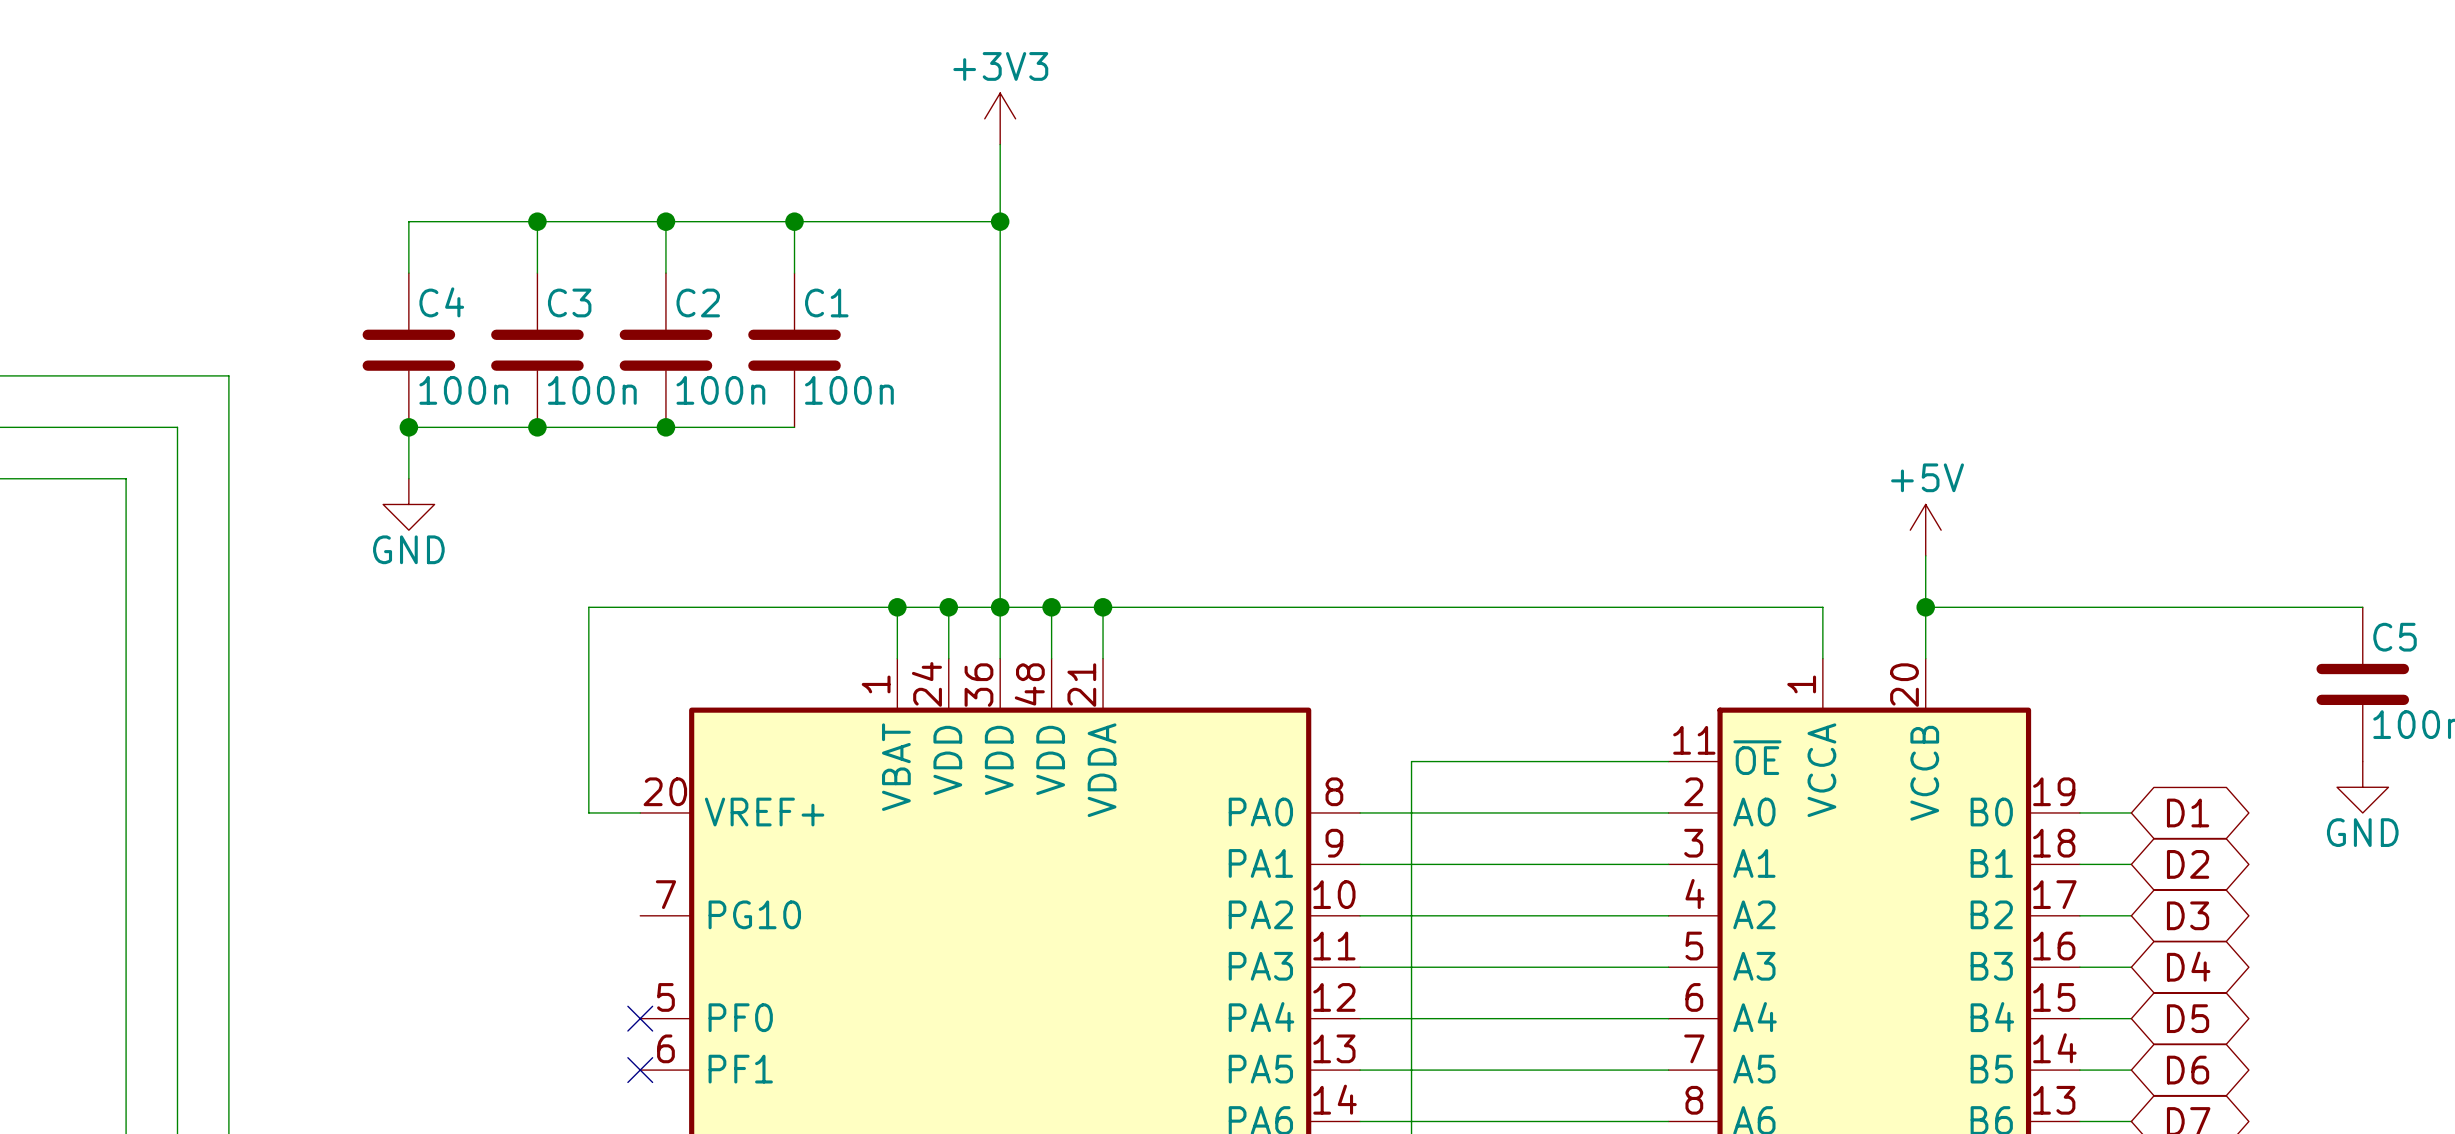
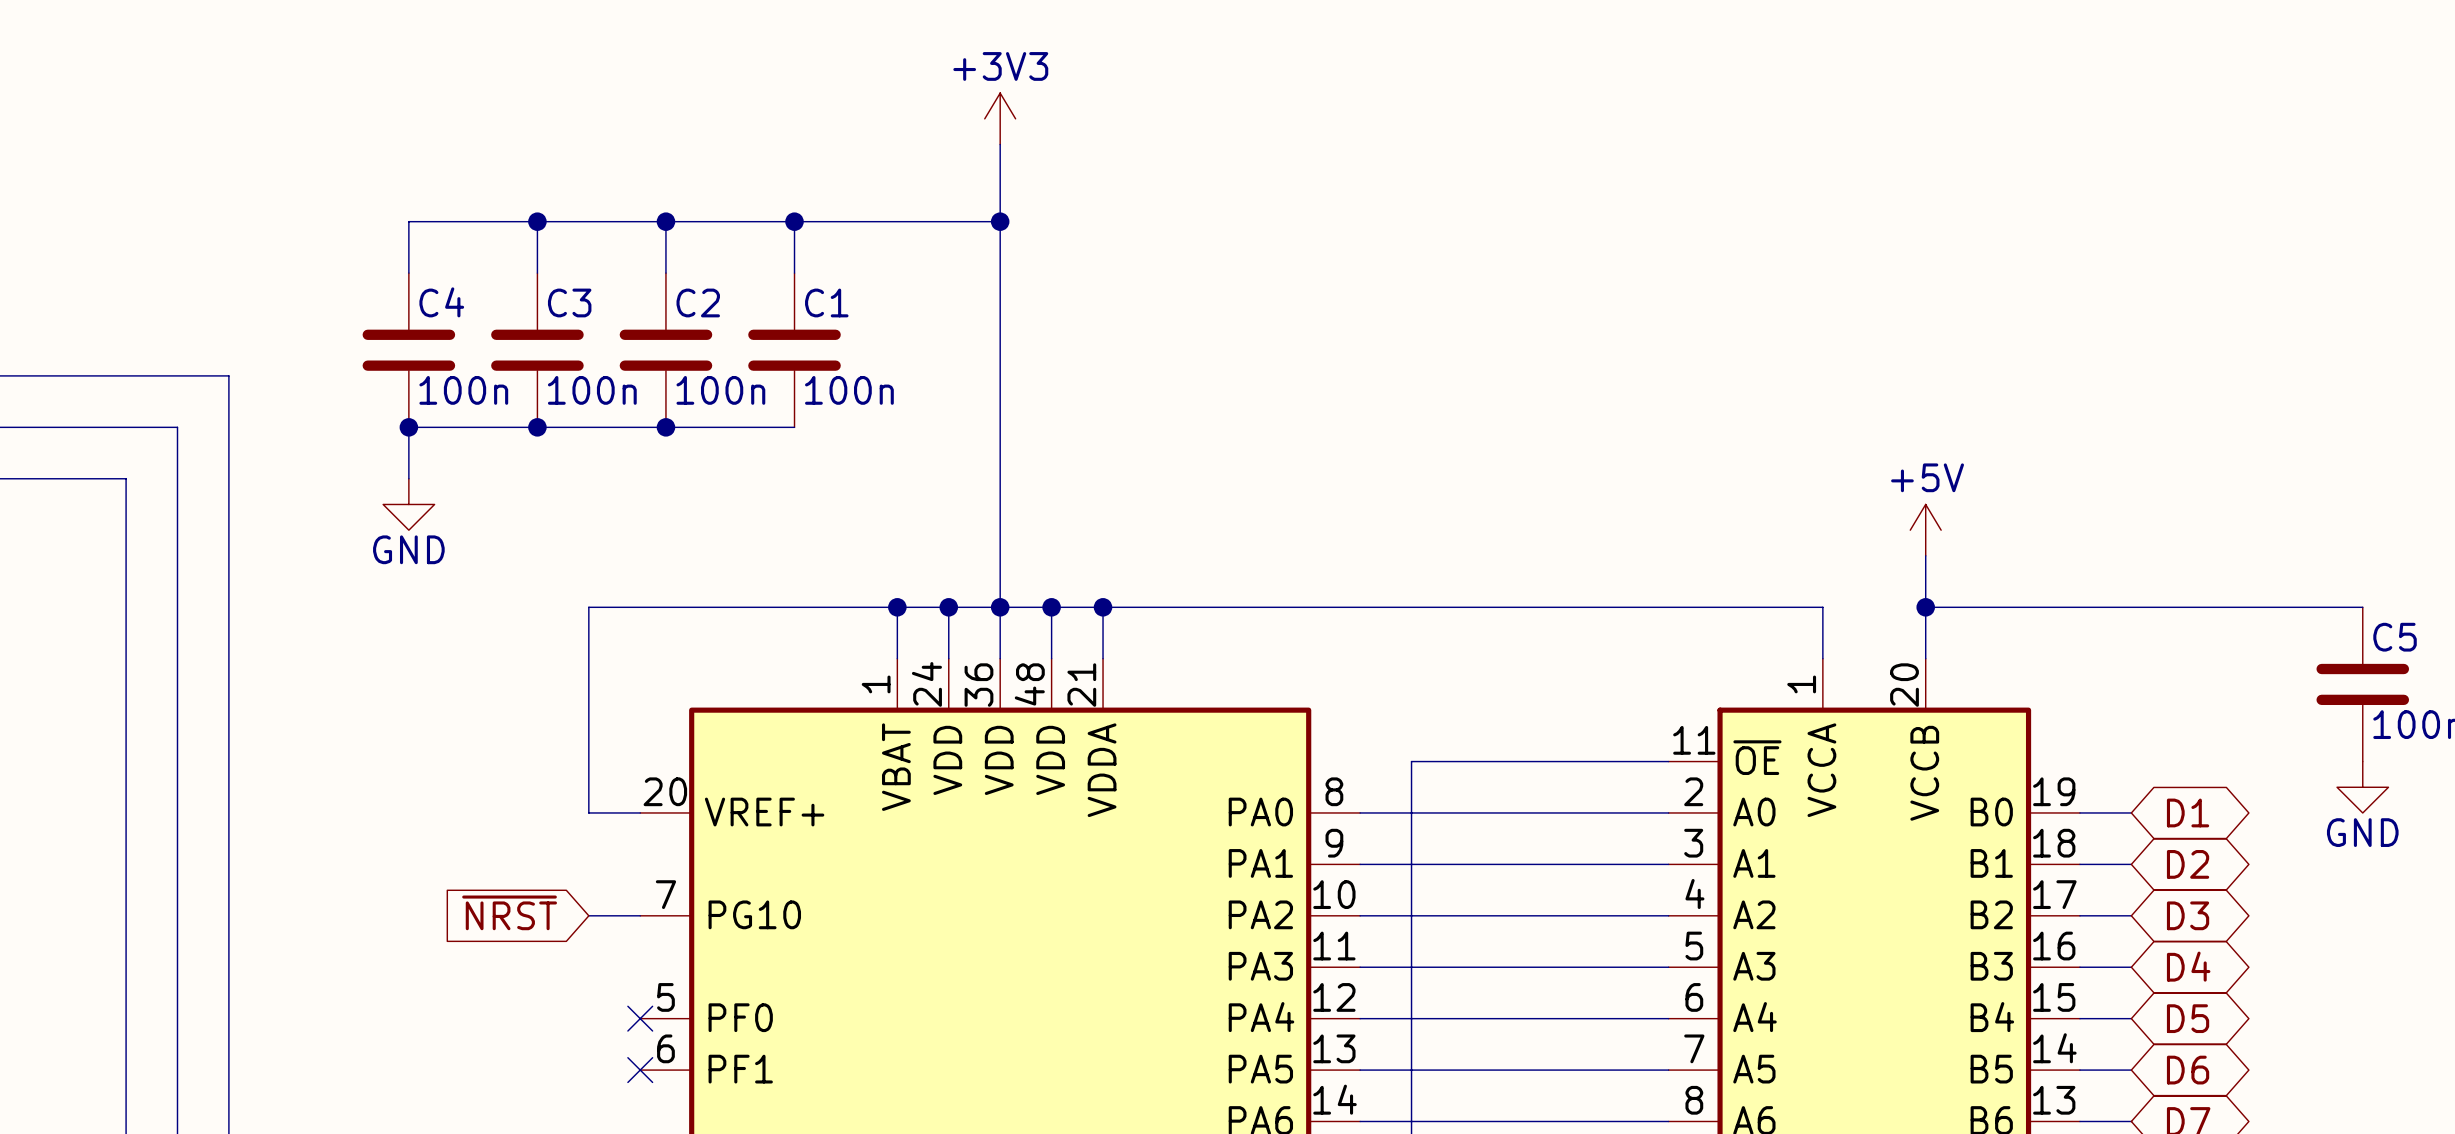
global label: none -> ~{NRST} (509, 912)
wire: none -> (588, 915) (640, 915)

